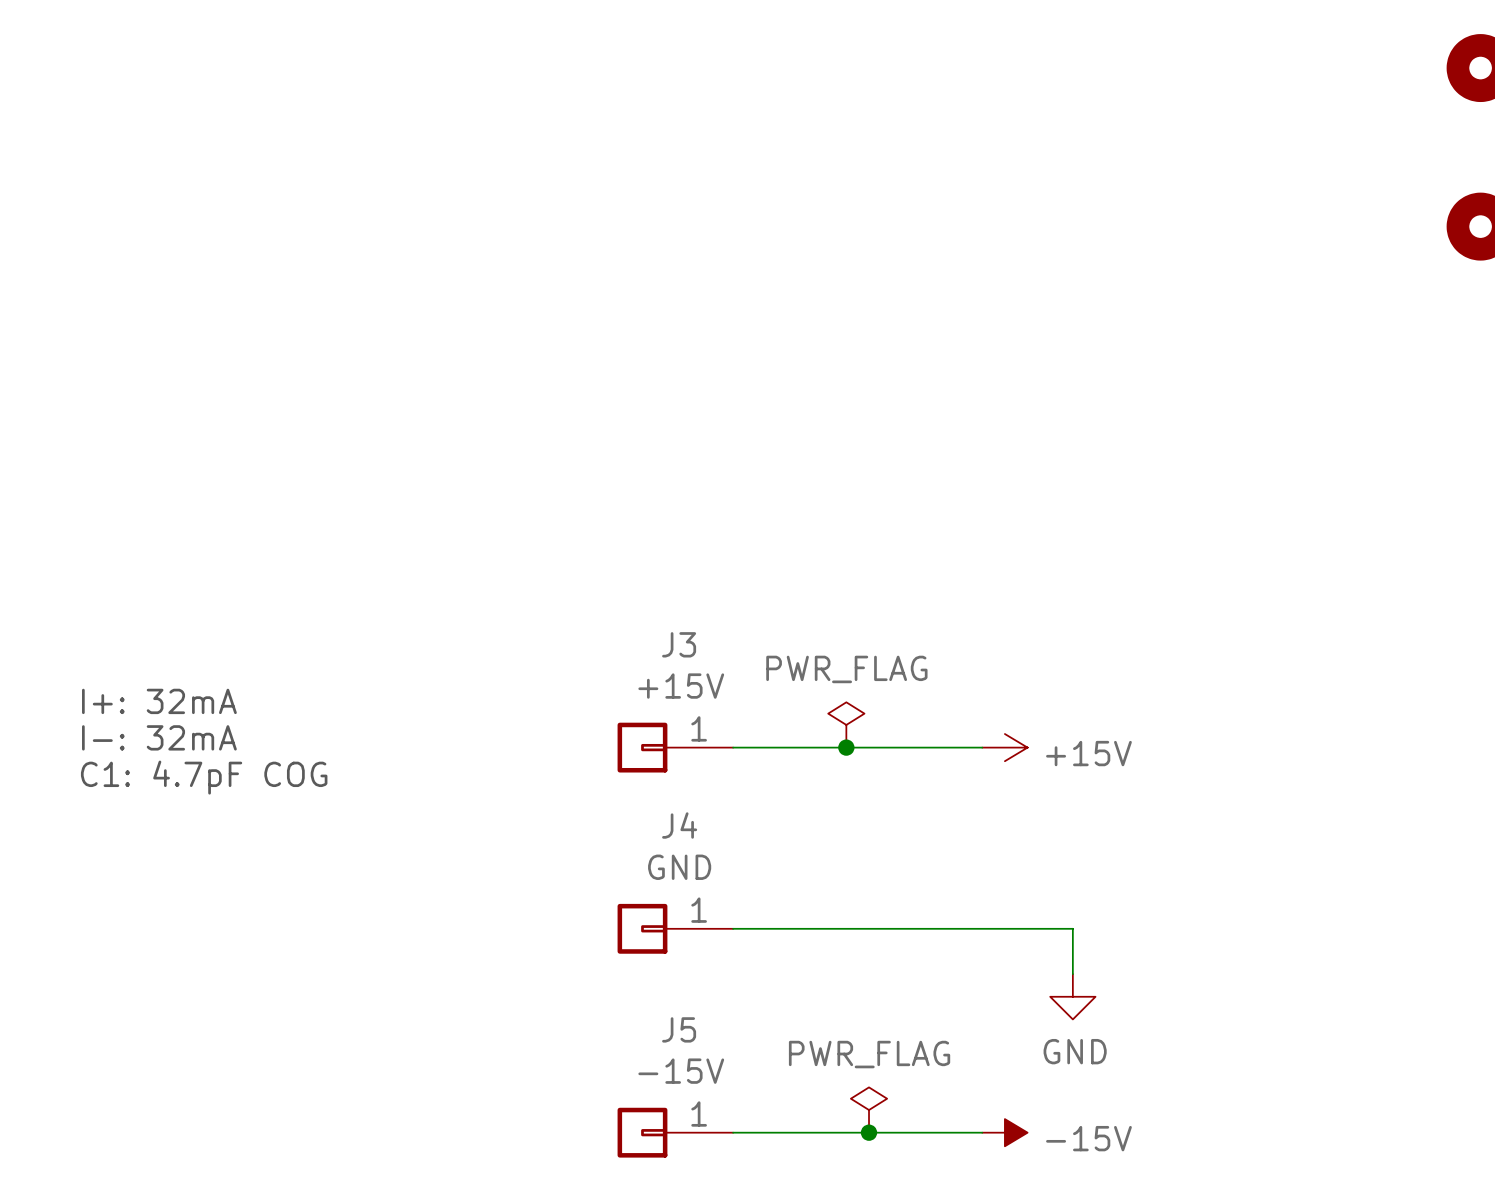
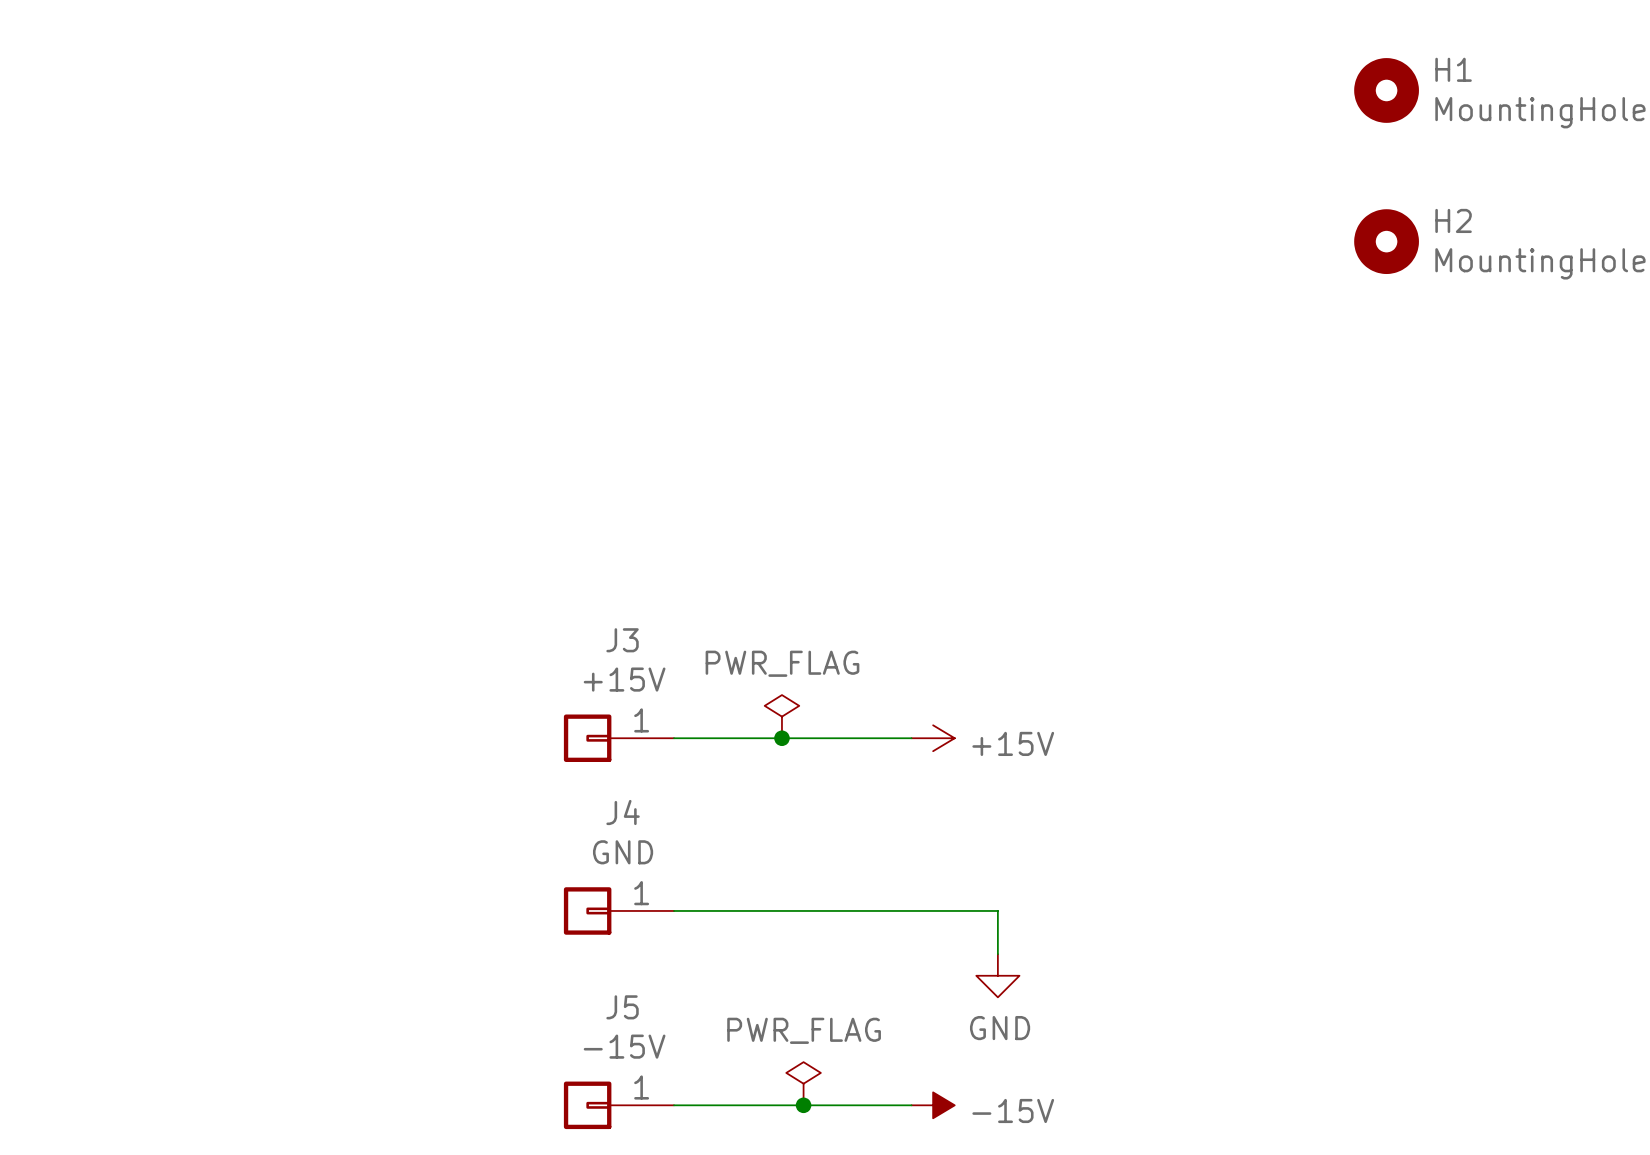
text: I+: 32mA (159, 701) -> none
text: I-: 32mA (159, 737) -> none
text: C1: 4.7pF COG (204, 777) -> none

